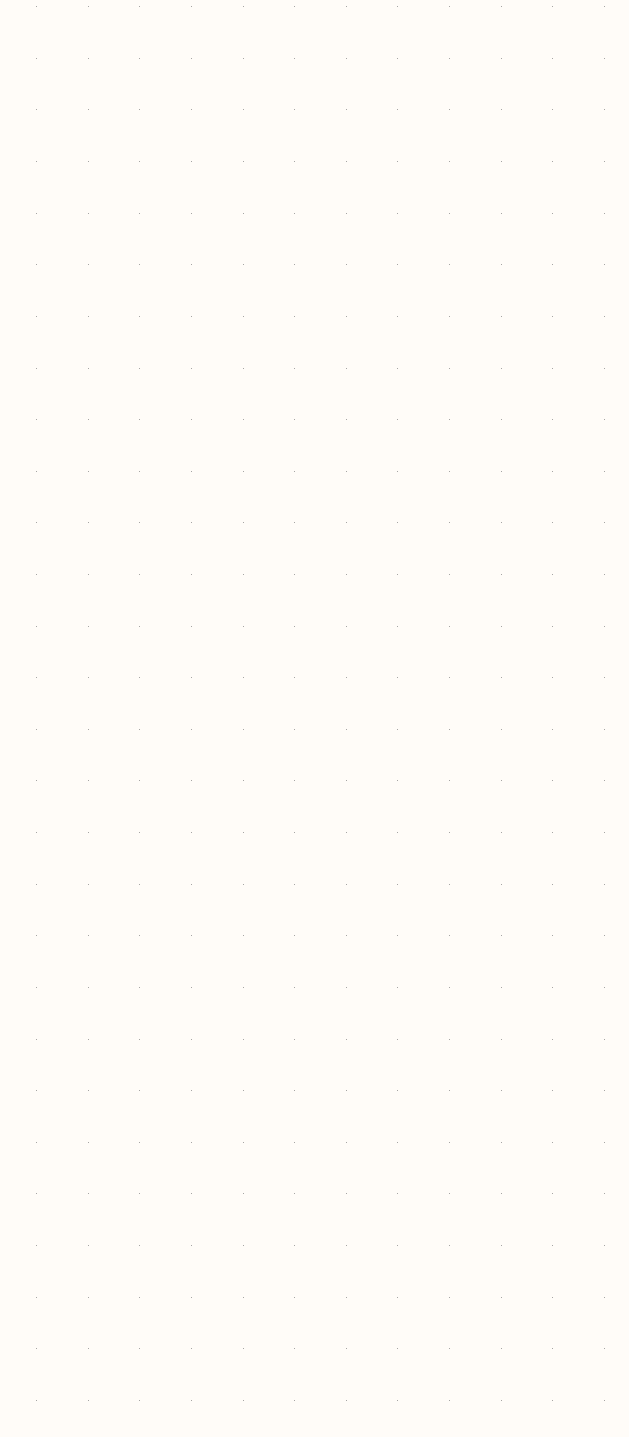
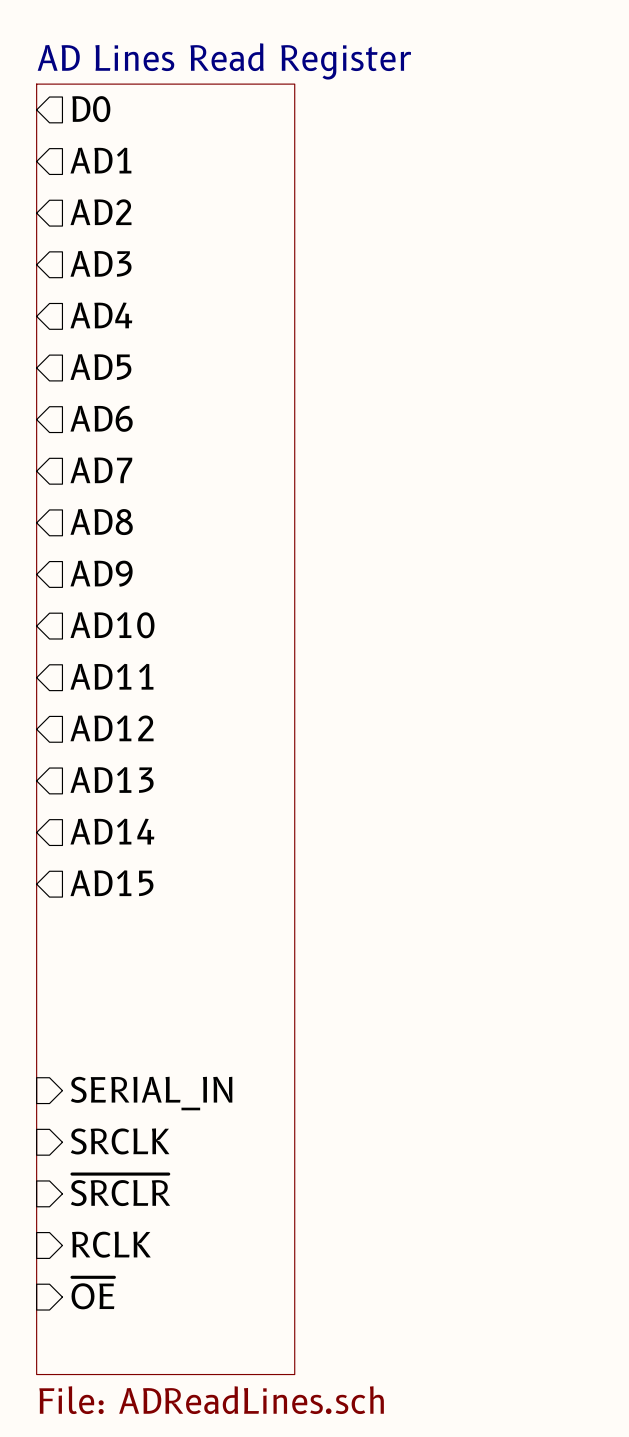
sheet pin: none -> D0 (91, 109)
sheet pin: none -> AD1 (100, 160)
sheet pin: none -> AD2 (100, 212)
sheet pin: none -> AD3 (101, 263)
sheet pin: none -> AD4 (101, 315)
sheet pin: none -> AD5 (100, 367)
sheet pin: none -> AD6 (101, 418)
sheet pin: none -> AD7 (101, 470)
sheet pin: none -> AD8 (101, 522)
sheet pin: none -> AD9 (101, 573)
sheet pin: none -> AD10 (112, 625)
sheet pin: none -> AD11 (111, 676)
sheet pin: none -> AD12 (112, 728)
sheet AD Lines Read Register: none -> File: ADReadLines.sch (165, 729)
sheet pin: none -> AD13 (112, 779)
sheet pin: none -> AD14 (112, 831)
sheet pin: none -> AD15 (111, 883)
sheet pin: none -> SERIAL_IN (151, 1093)
sheet pin: none -> SRCLK (120, 1141)
sheet pin: none -> ~{SRCLR} (120, 1190)
sheet pin: none -> RCLK (111, 1244)
sheet pin: none -> ~{OE} (92, 1293)

